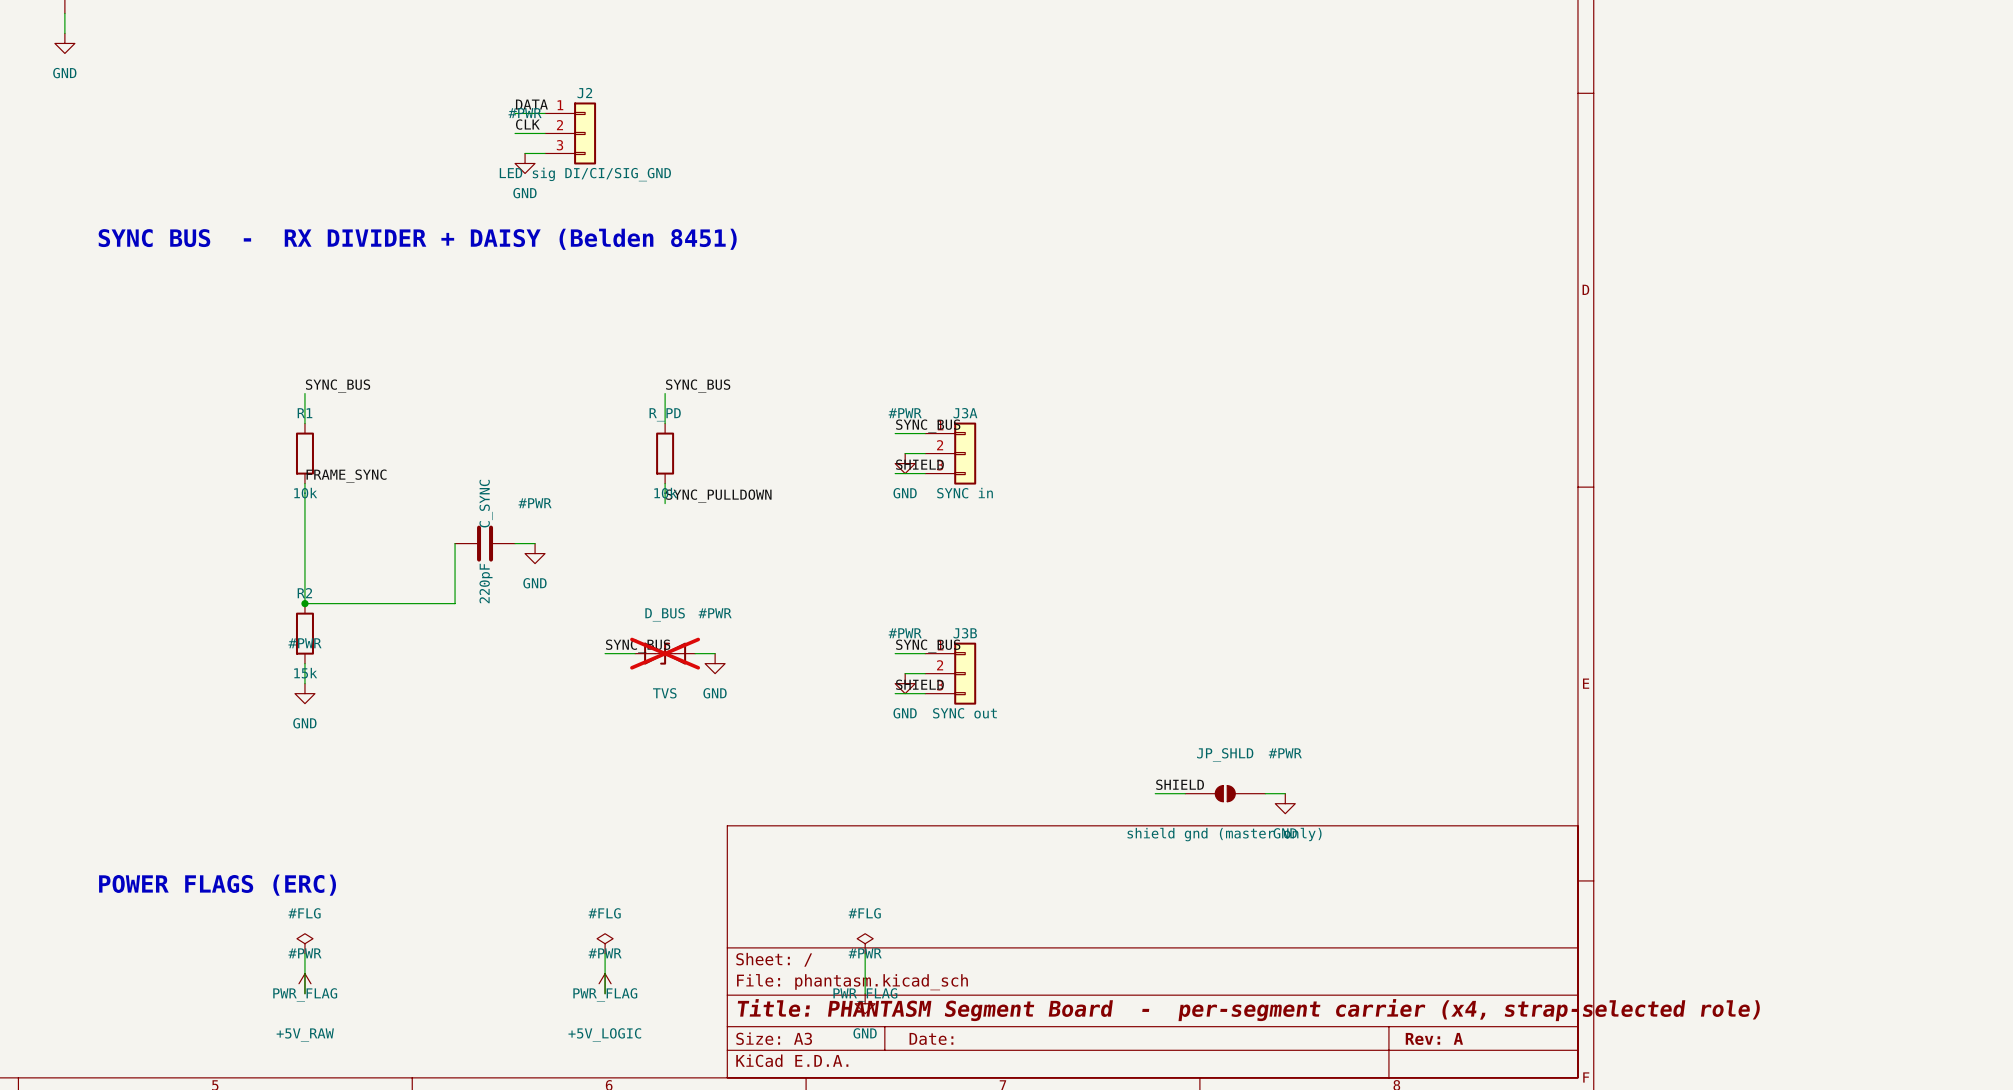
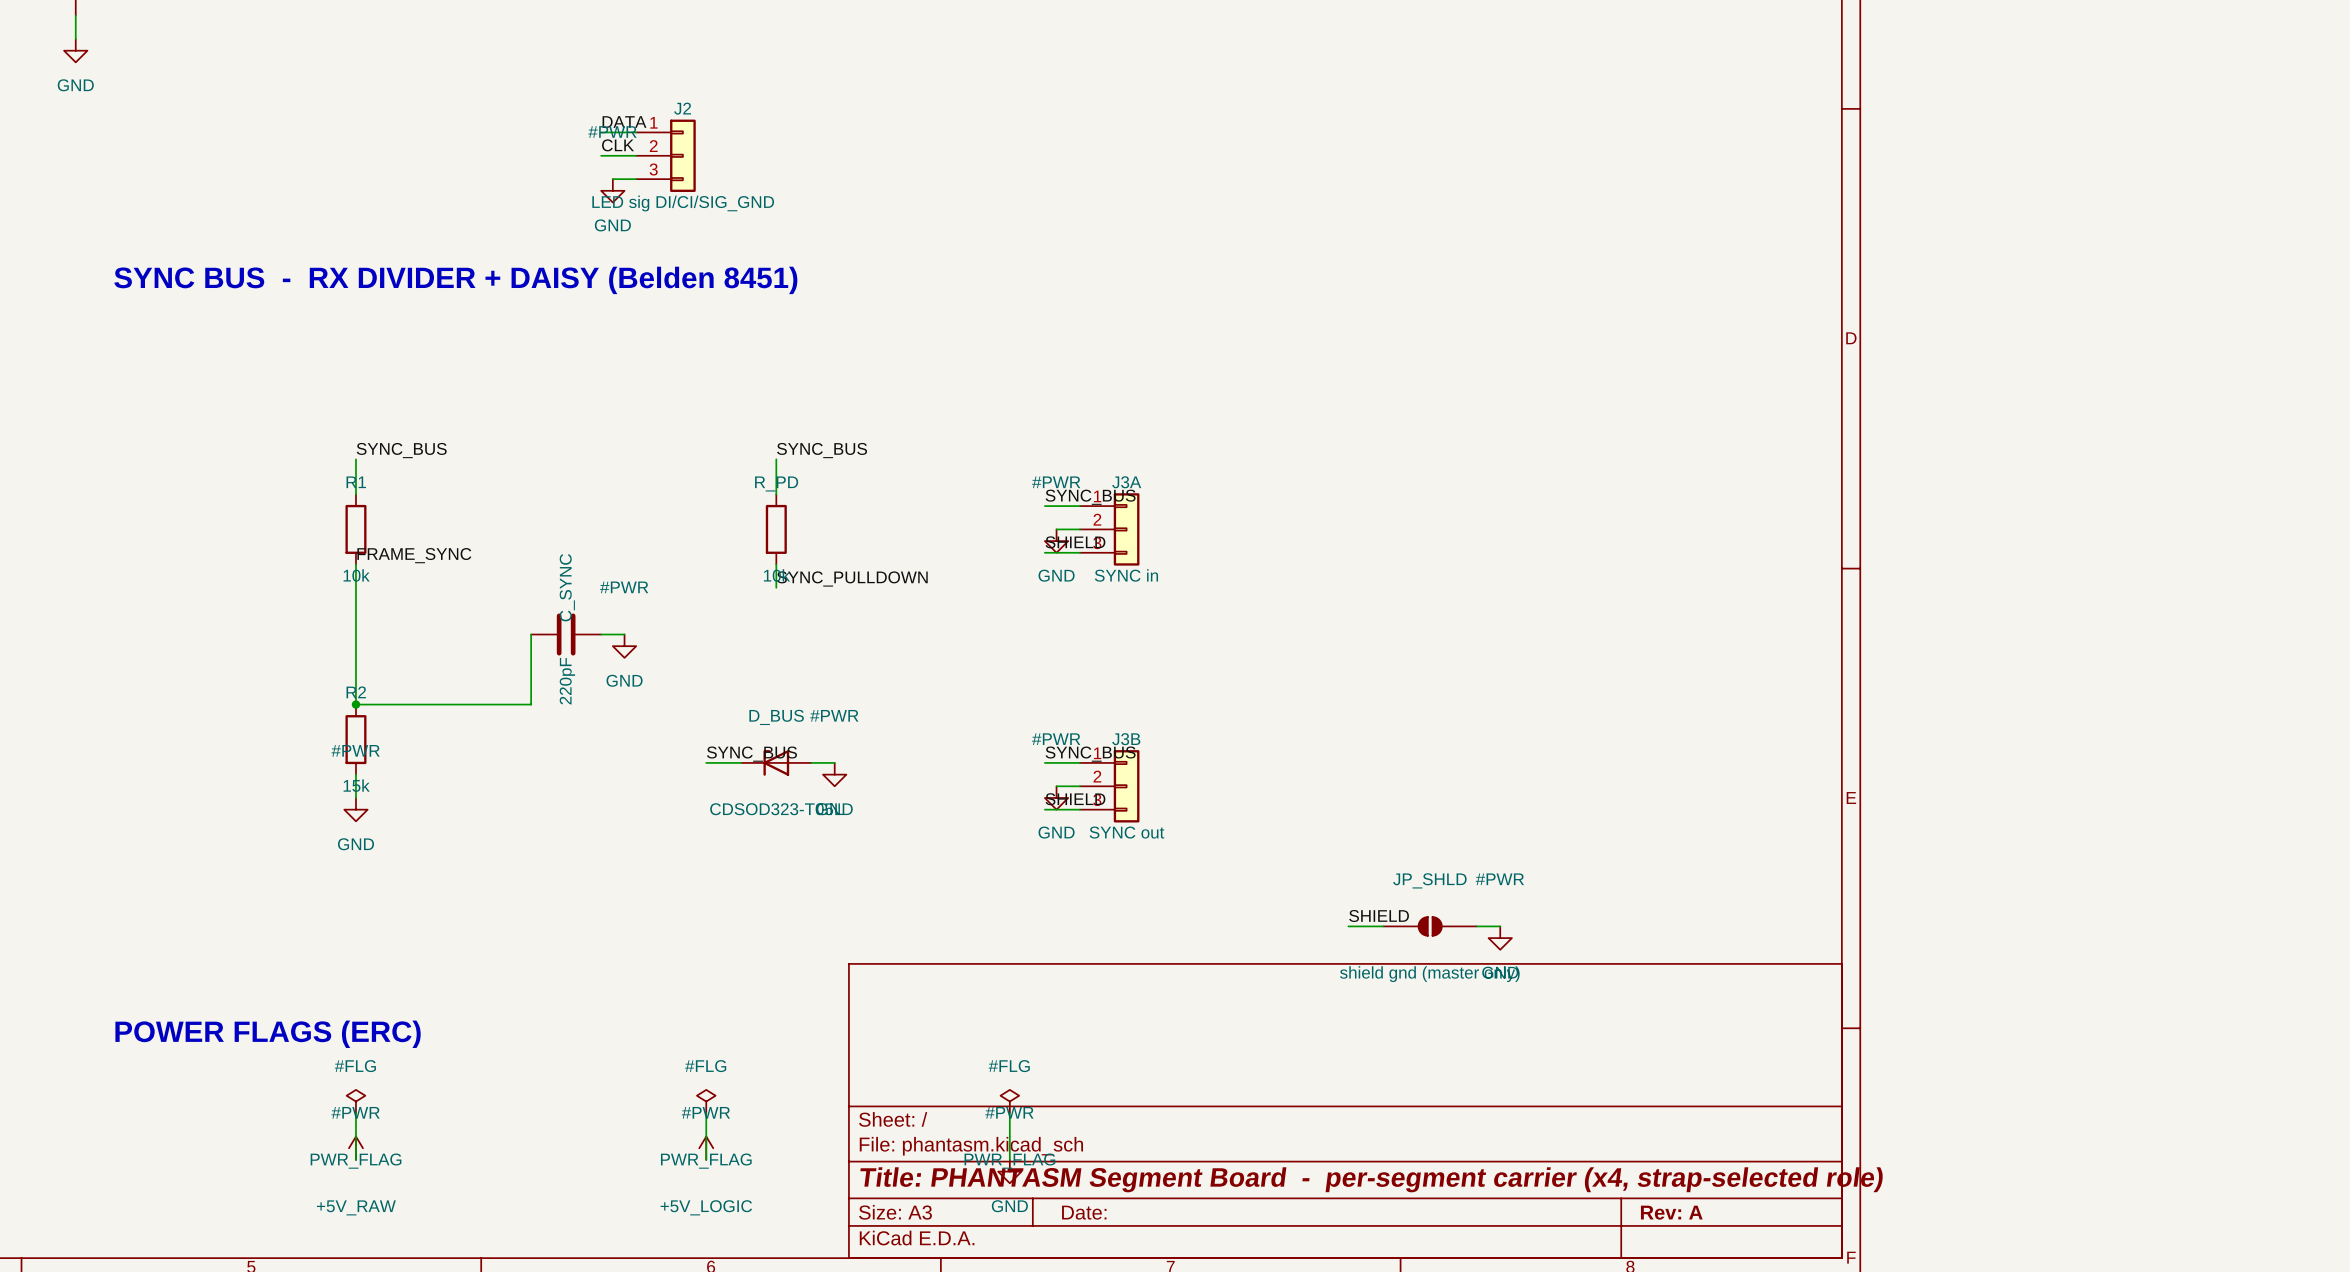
D_BUS symbol: [635, 642, 696, 665] -> [741, 750, 812, 776]
D_BUS do-not-place cross: (665, 653) -> none
D_BUS value: TVS (664, 693) -> CDSOD323-T05L (776, 809)

